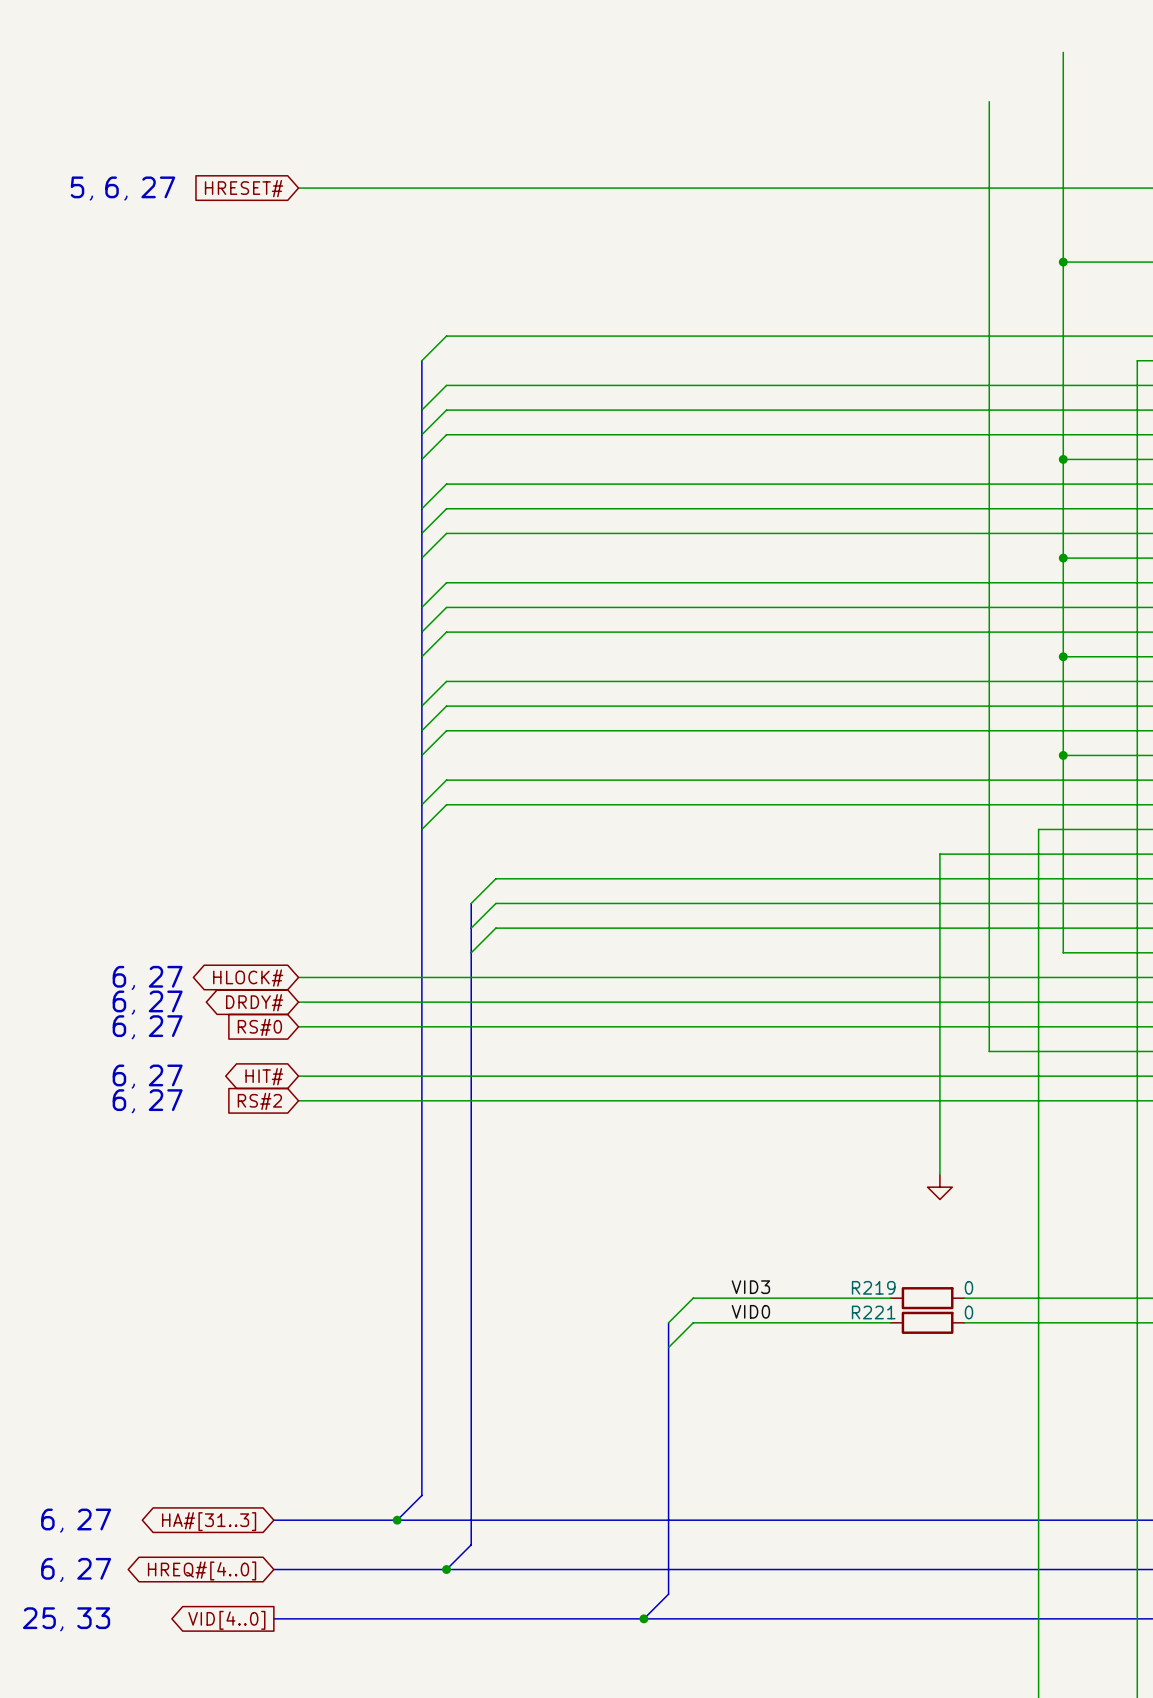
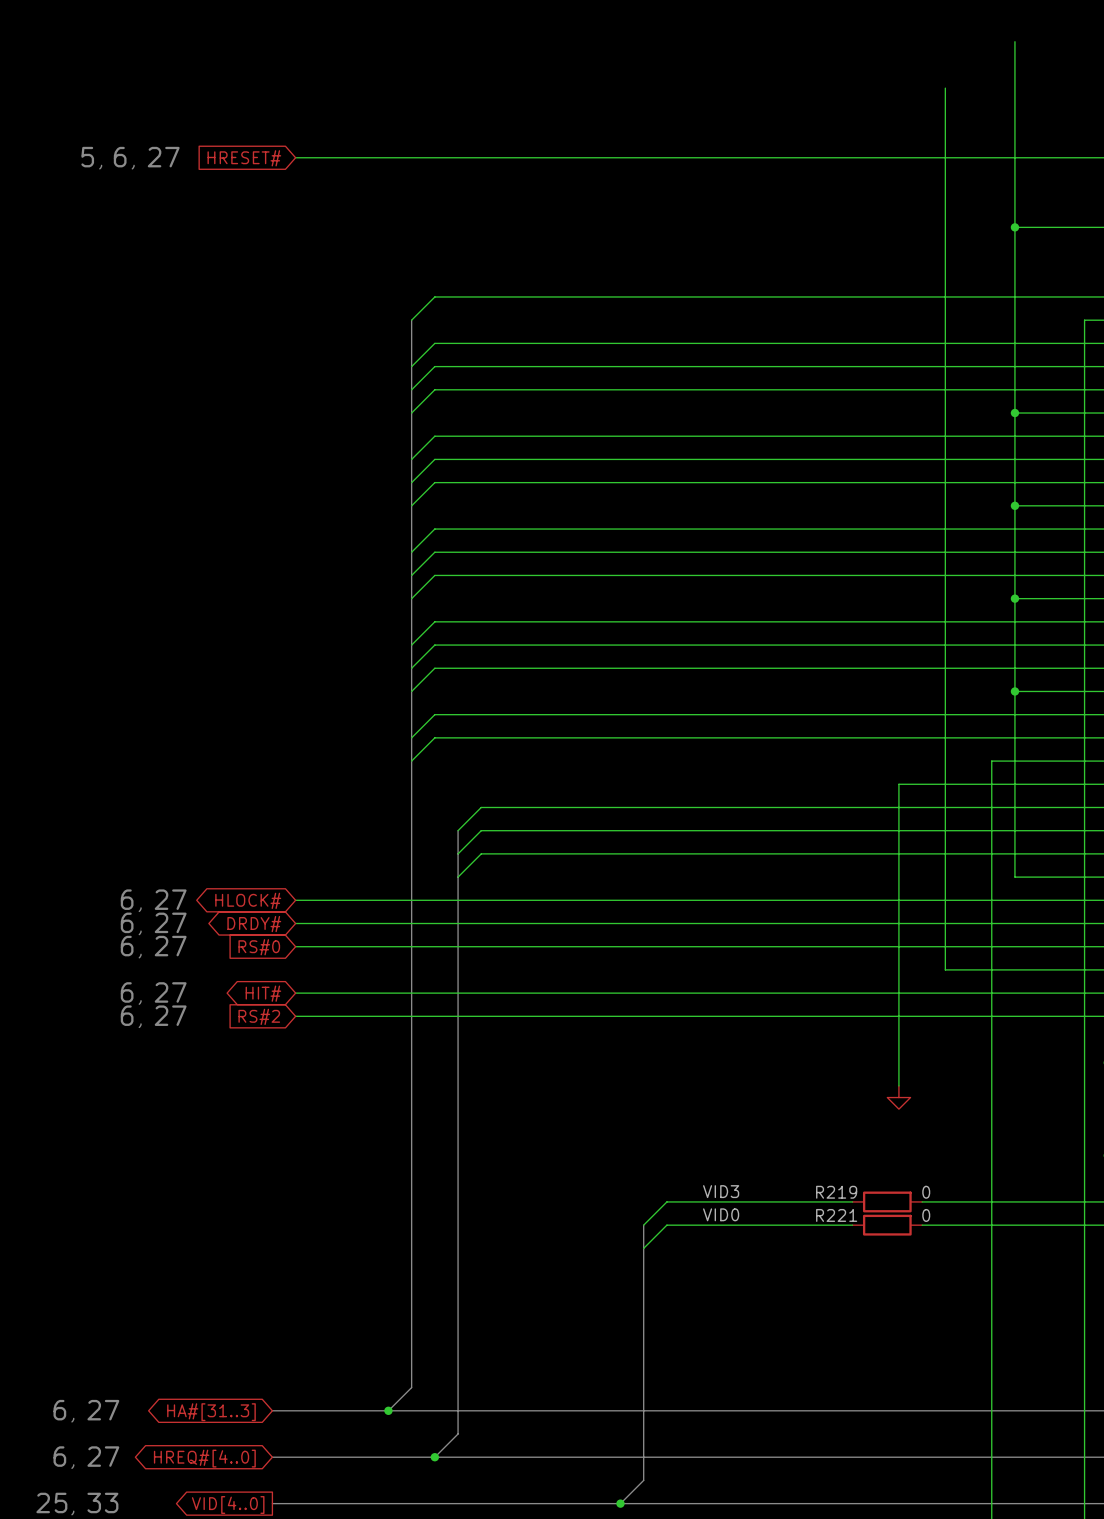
wire: (1063, 52) (1063, 64) -> none
wire: (989, 101) (989, 114) -> none

